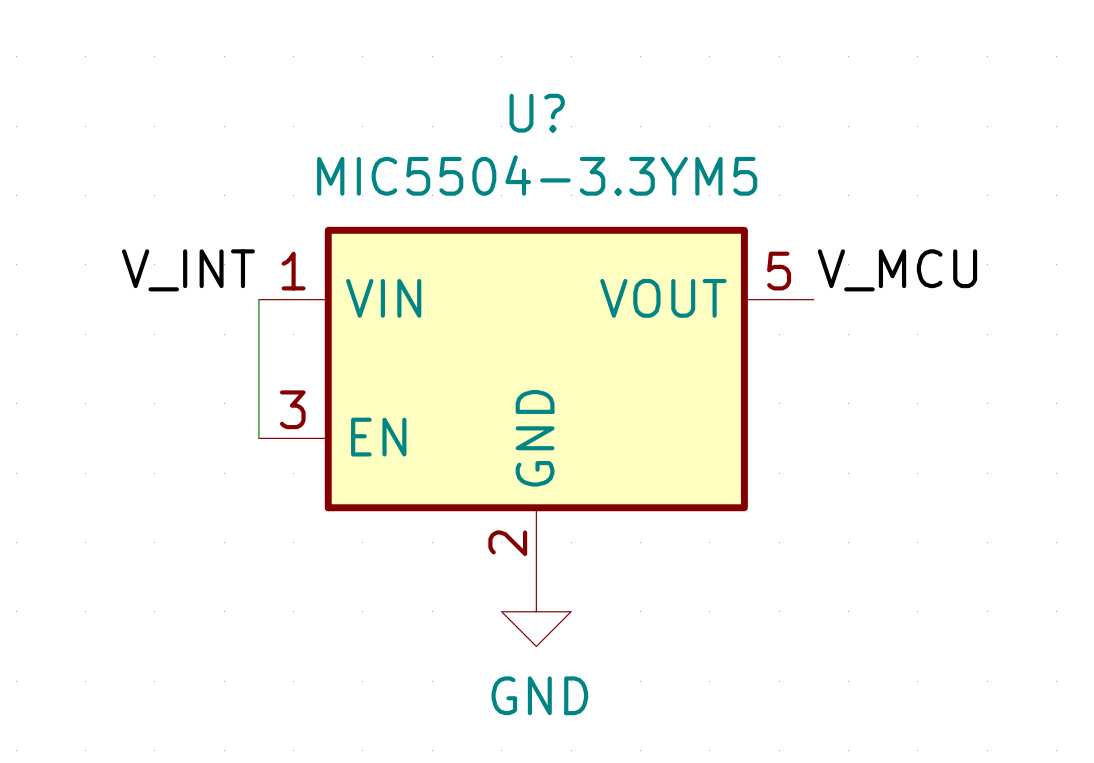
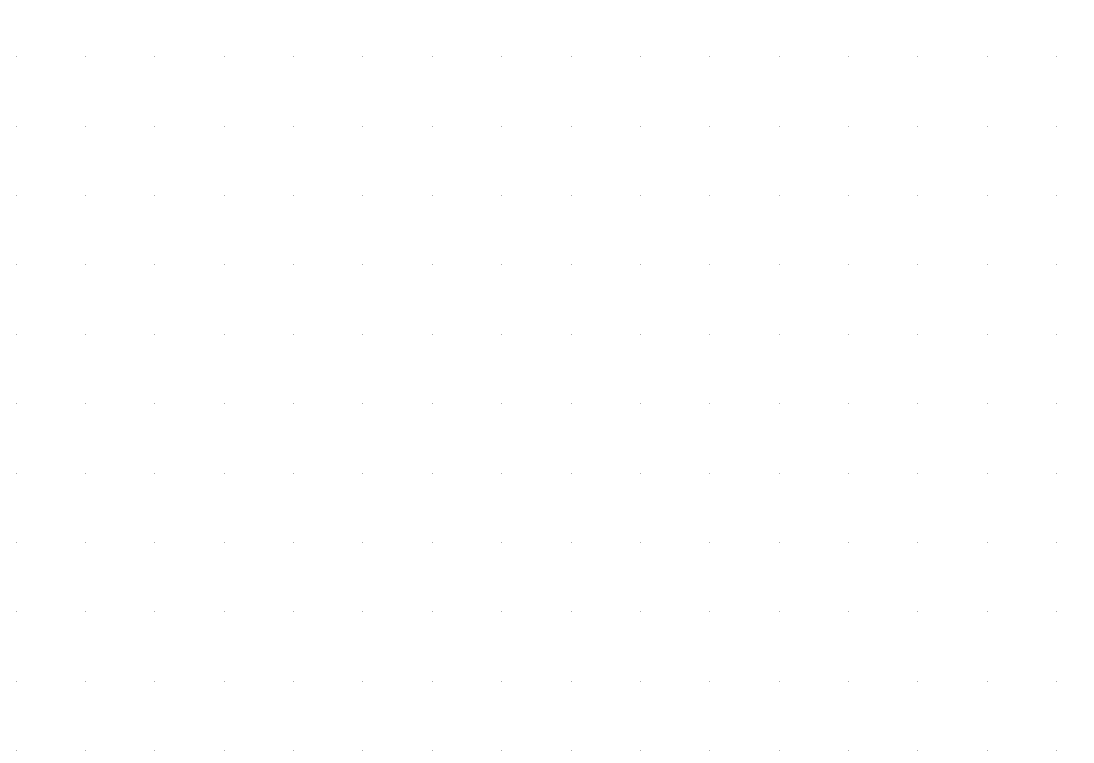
label: V_INT (188, 270) -> none
label: V_MCU (897, 270) -> none
wire: (258, 299) (258, 438) -> none
U?: MIC5504-3.3YM5 (536, 401) -> none
power symbol: GND (536, 611) -> none

